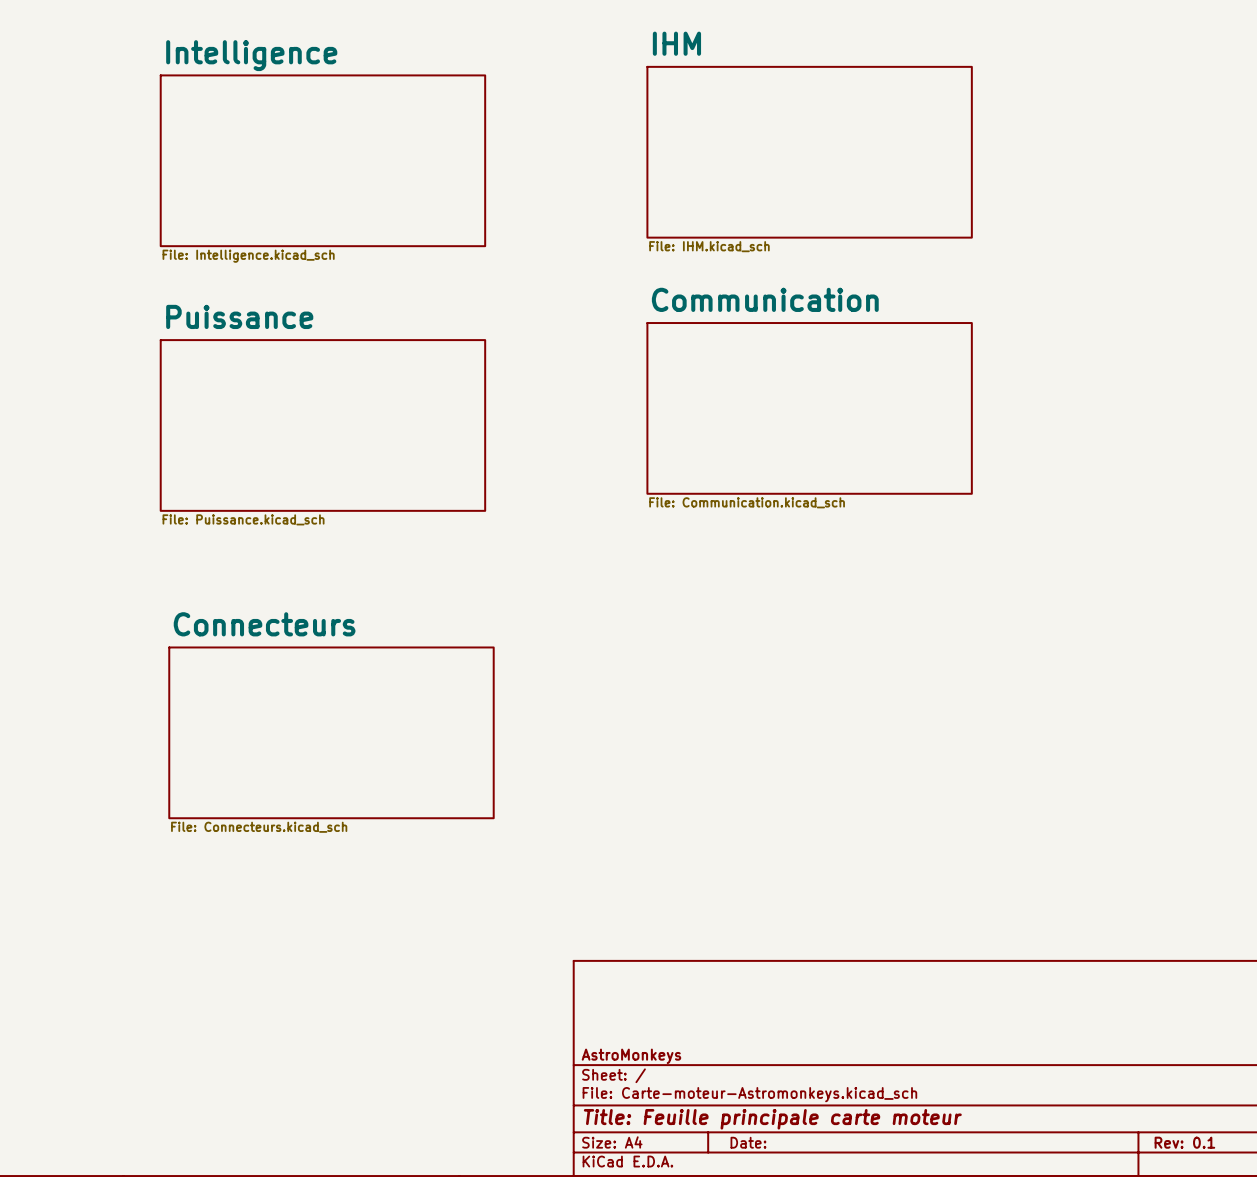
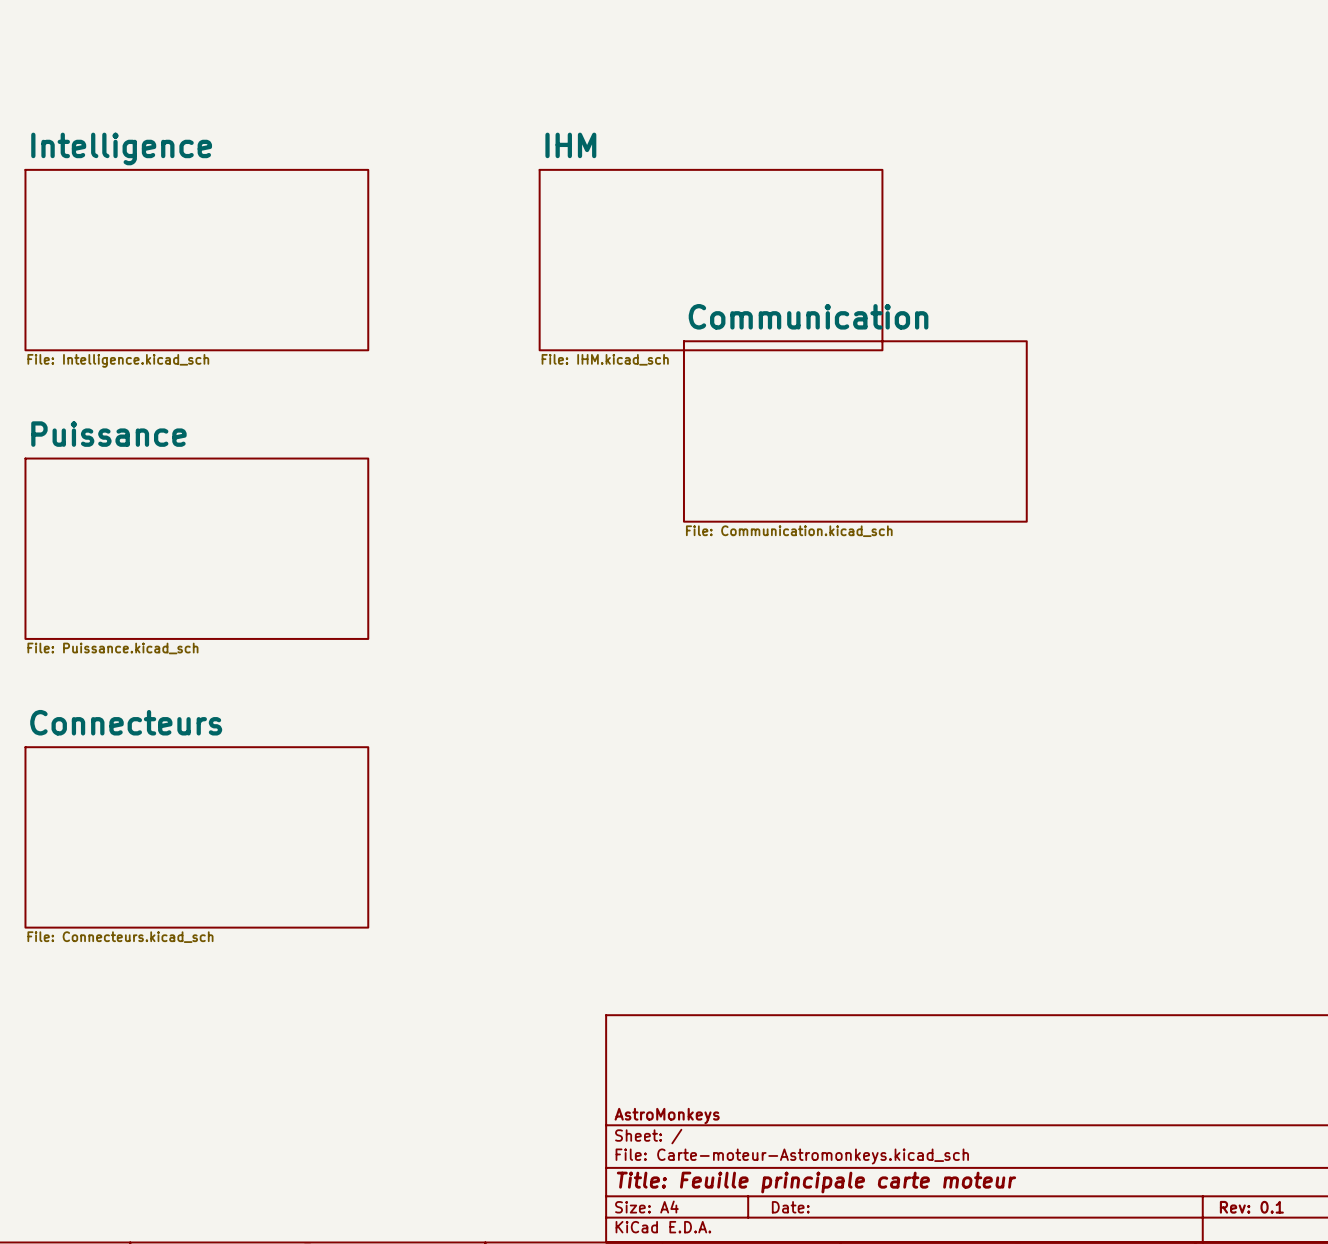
sheet IHM position: (809, 152) -> (711, 260)
sheet Intelligence position: (322, 160) -> (196, 260)
sheet Puissance position: (322, 425) -> (196, 548)
sheet Connecteurs position: (331, 732) -> (196, 837)

